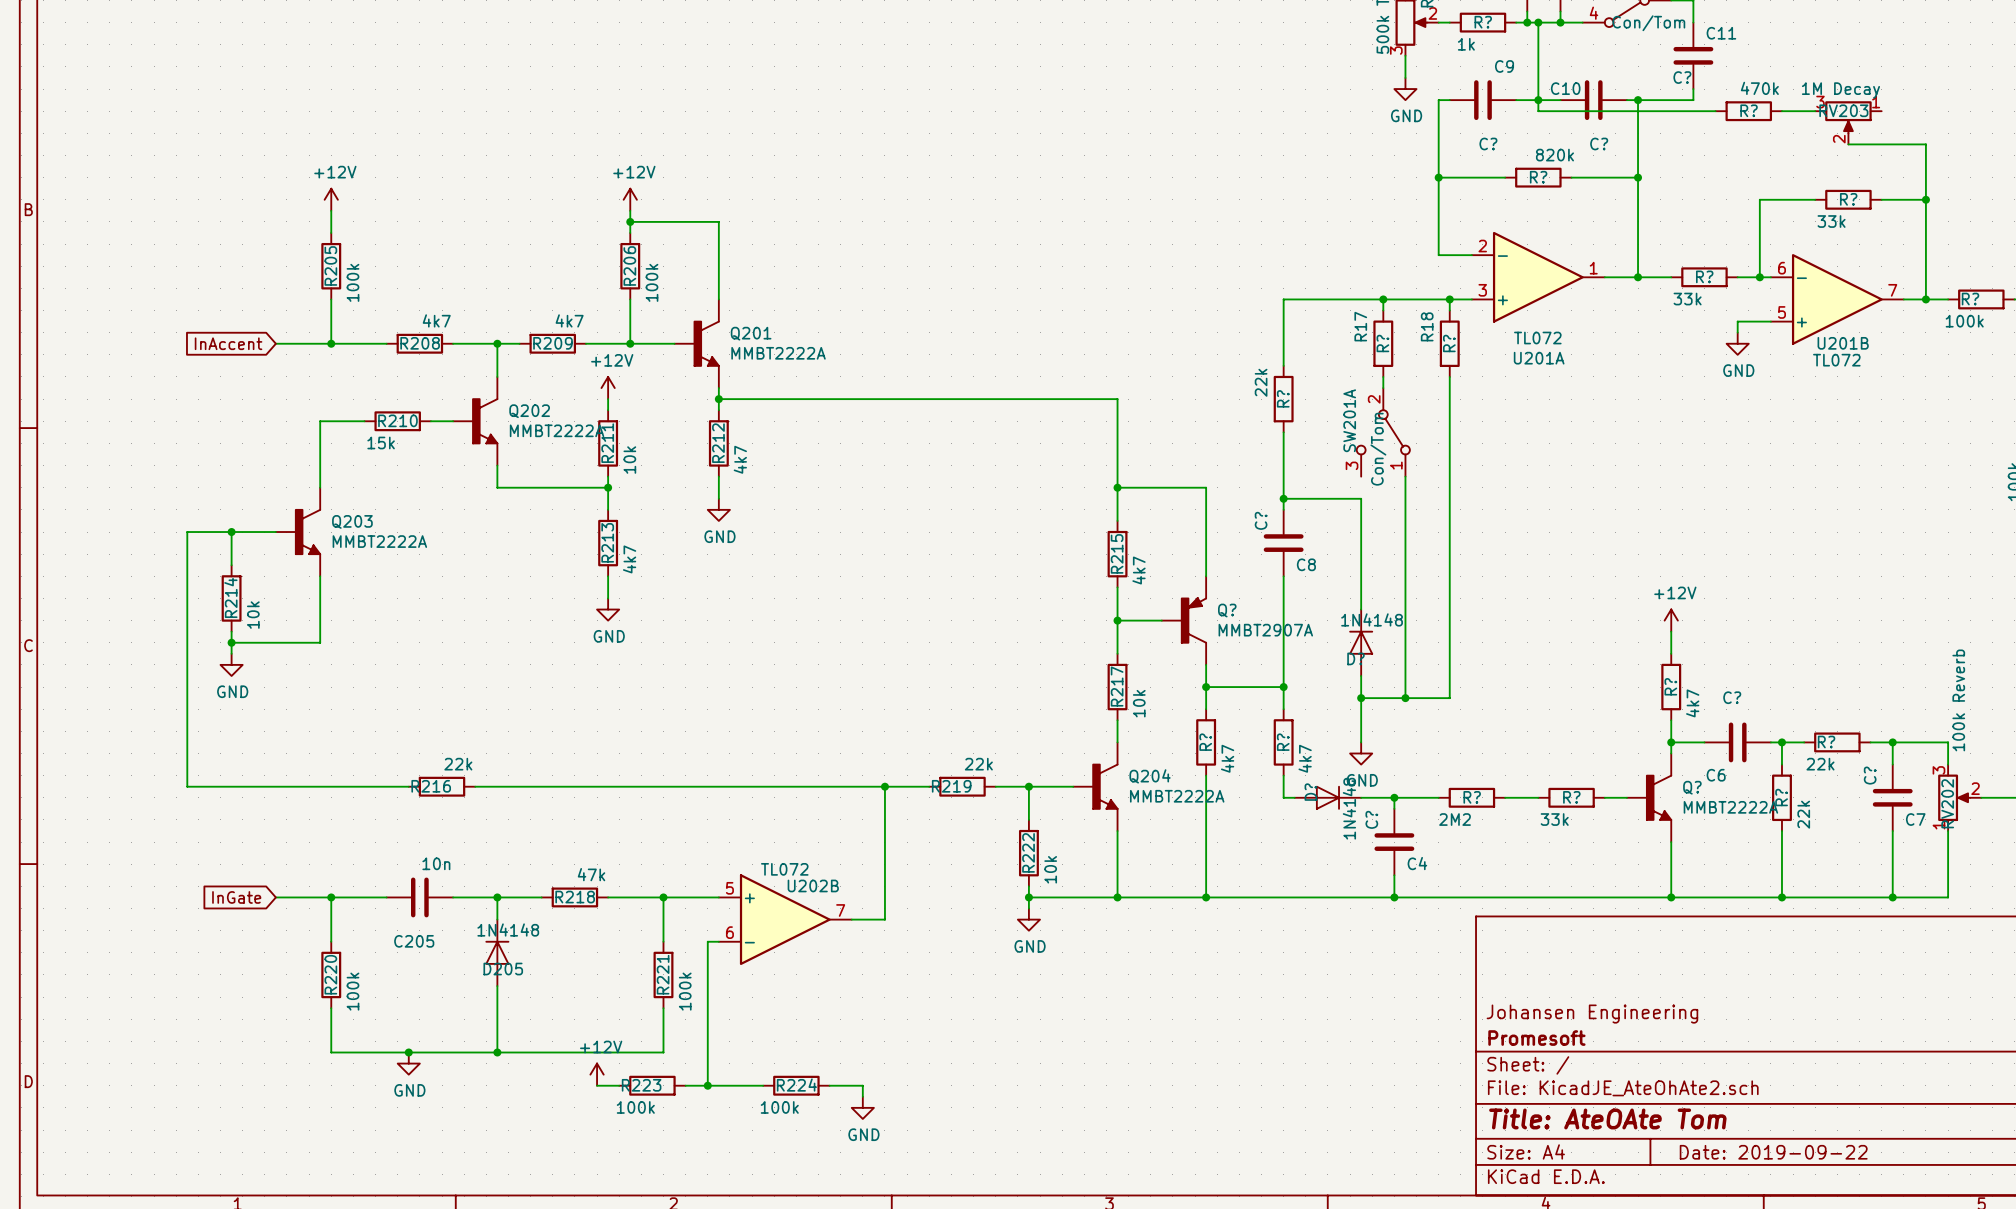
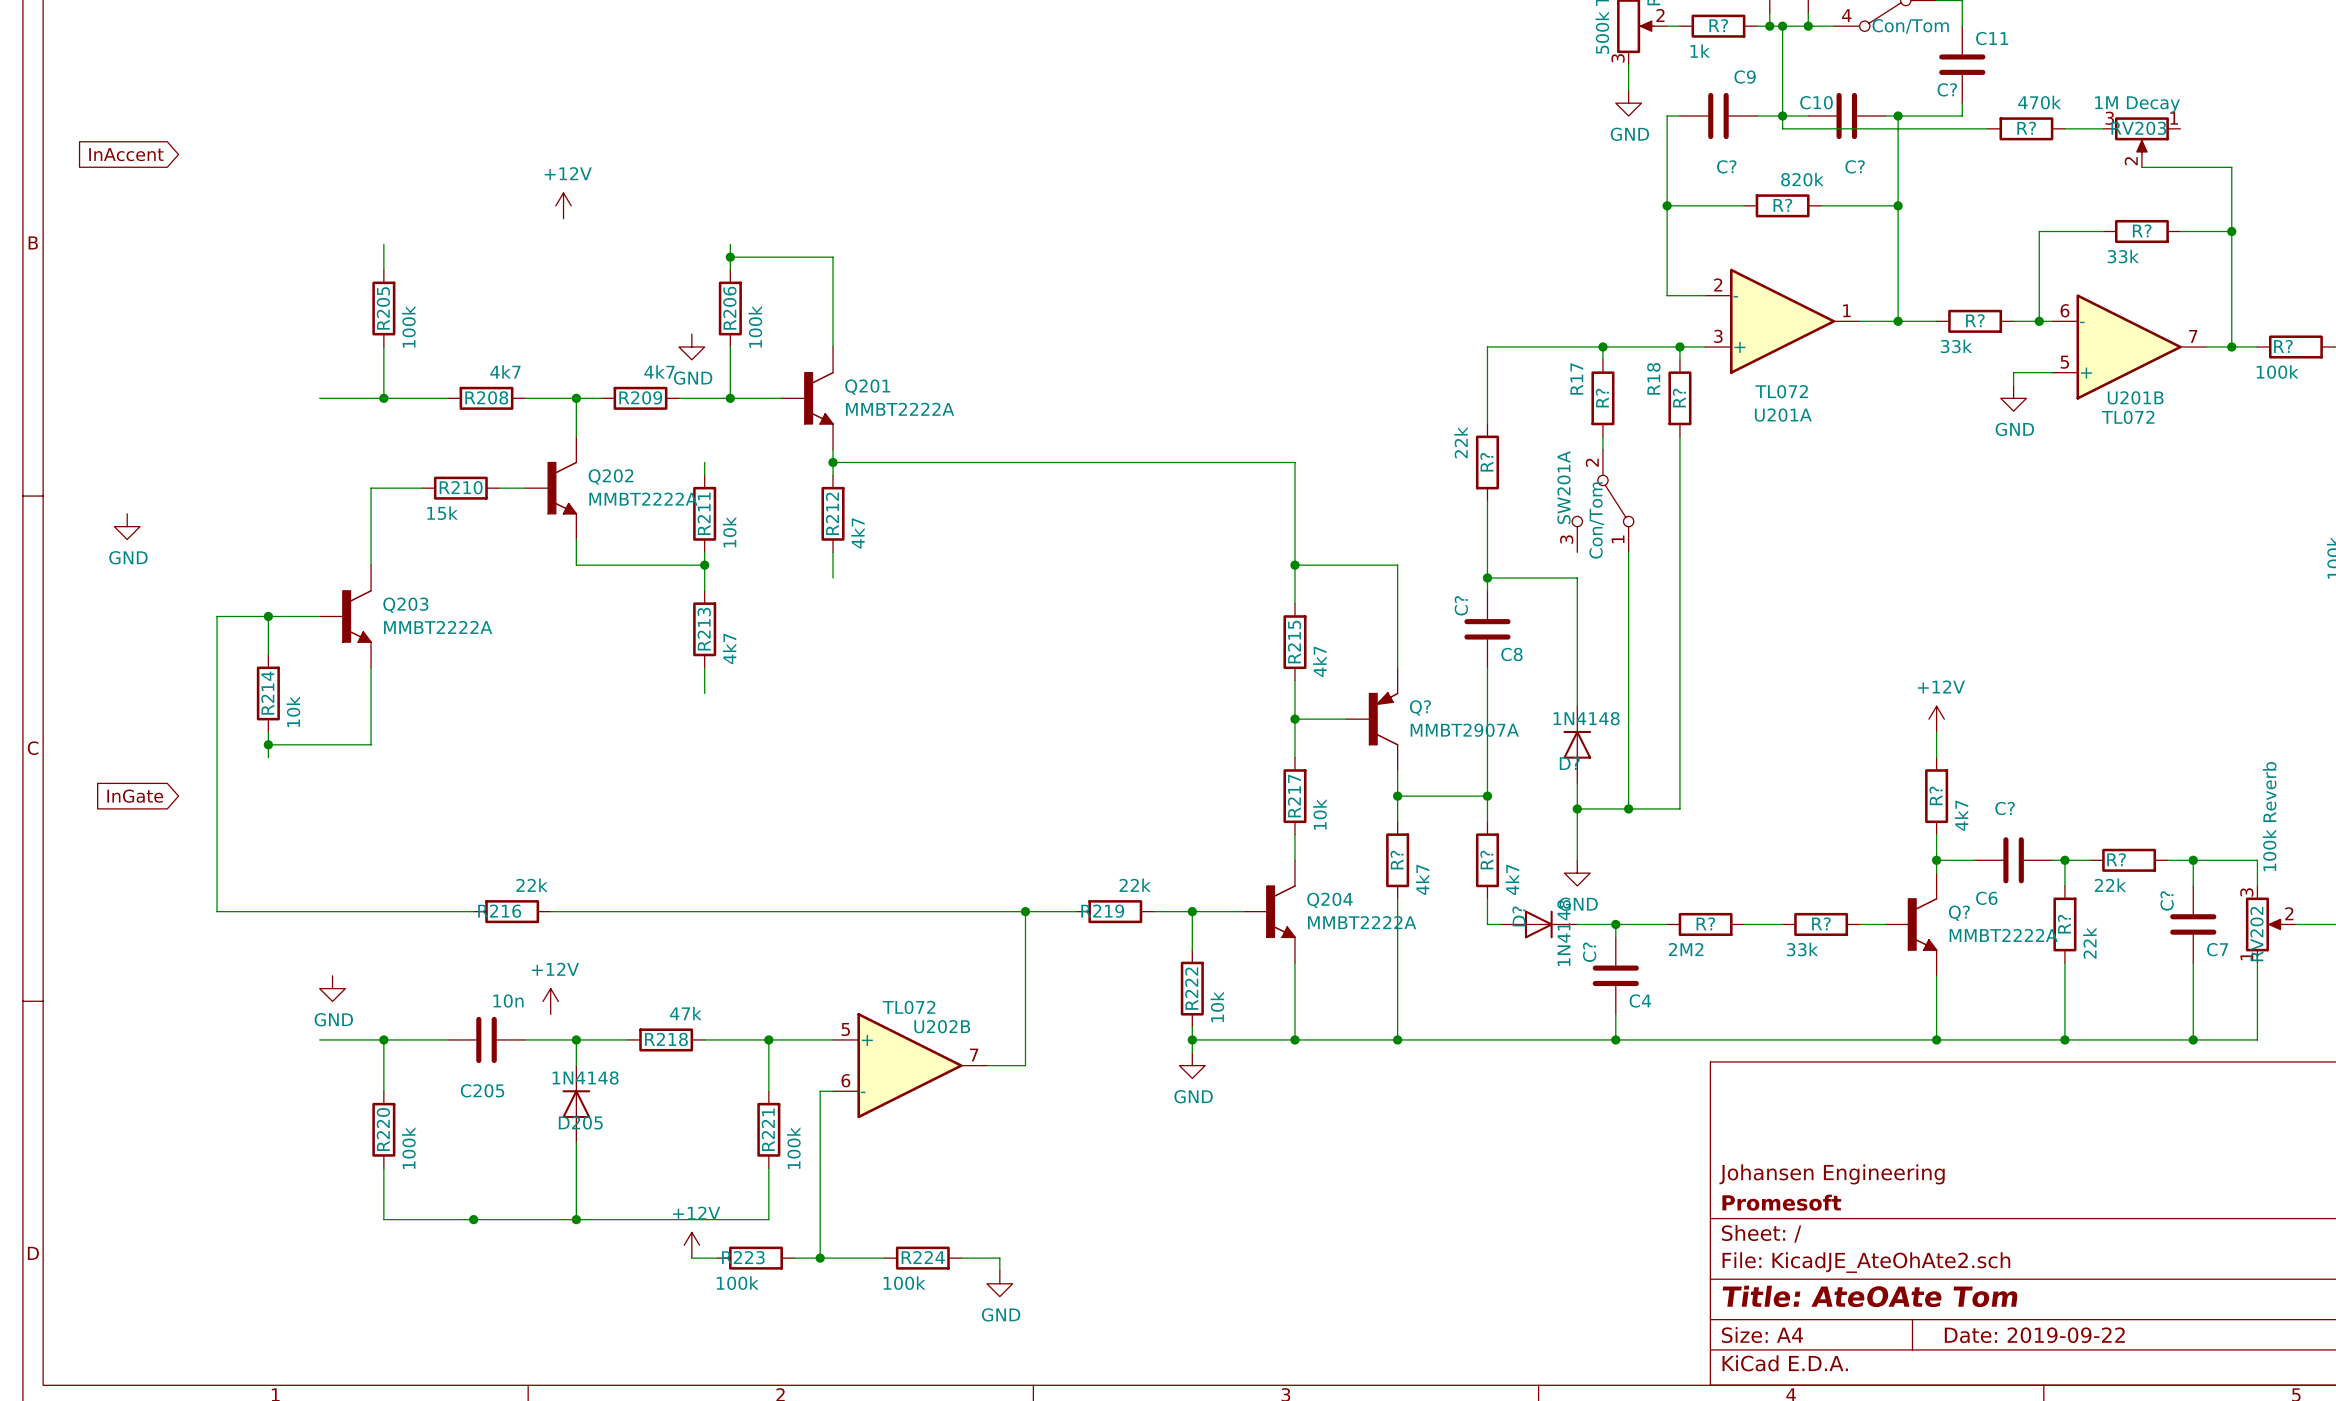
global label: none -> InAccent (126, 154)
power symbol: none -> +12V (563, 205)
power symbol: +12V (331, 199) -> none
power symbol: +12V (630, 199) -> none
power symbol: none -> GND (691, 347)
global label: InAccent (228, 343) -> none
power symbol: +12V (608, 388) -> none
power symbol: none -> GND (127, 526)
power symbol: GND (718, 509) -> none
power symbol: GND (608, 609) -> none
power symbol: GND (231, 664) -> none
global label: none -> InGate (135, 796)
power symbol: none -> GND (332, 988)
power symbol: none -> +12V (550, 1001)
global label: InGate (236, 897) -> none
power symbol: GND (408, 1063) -> none

